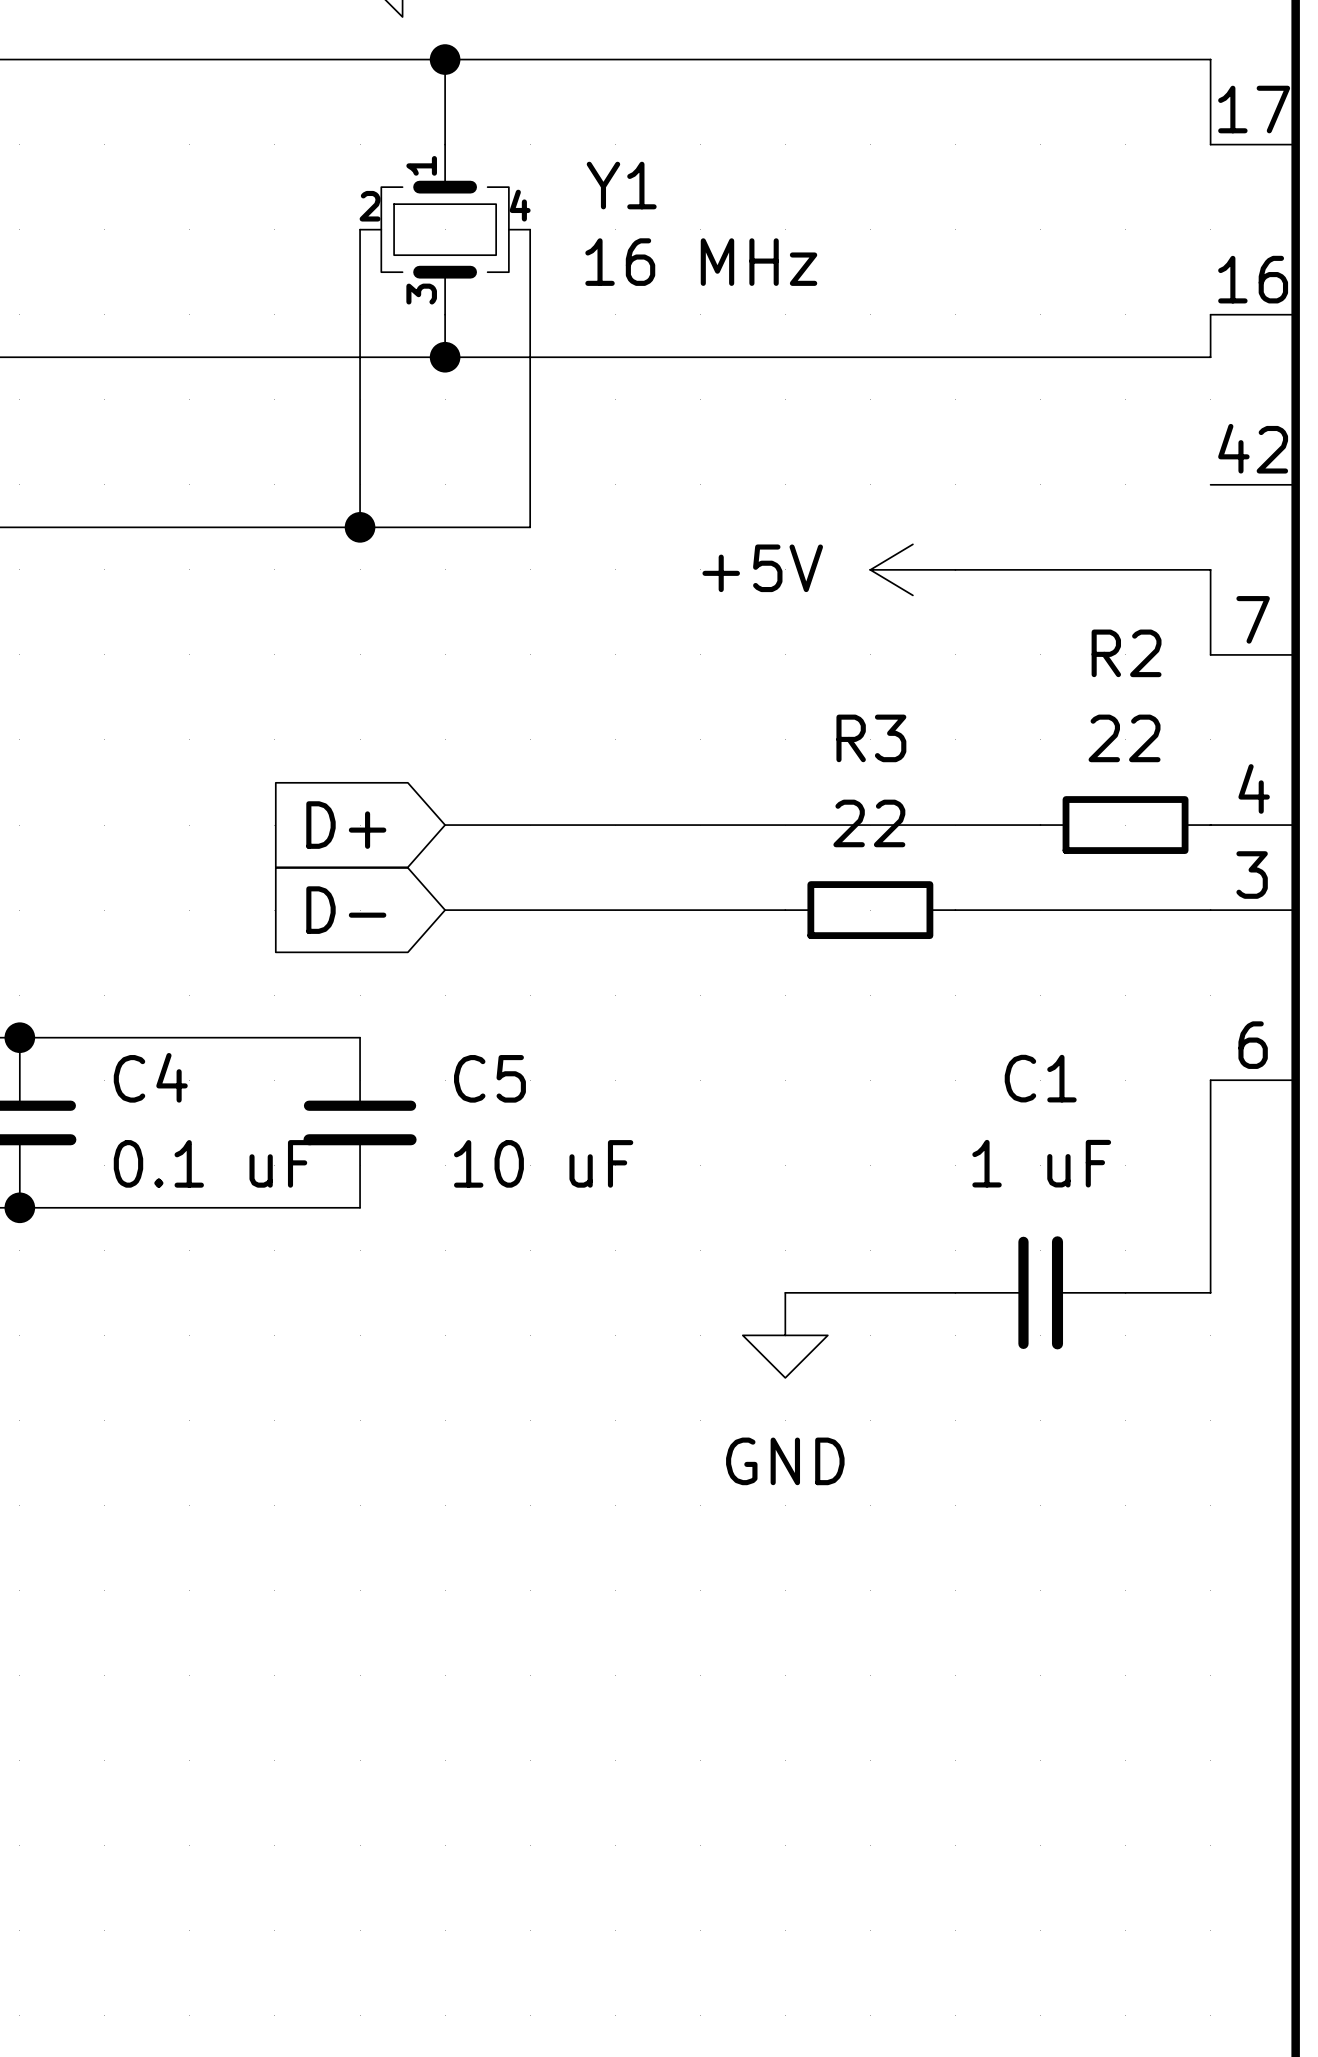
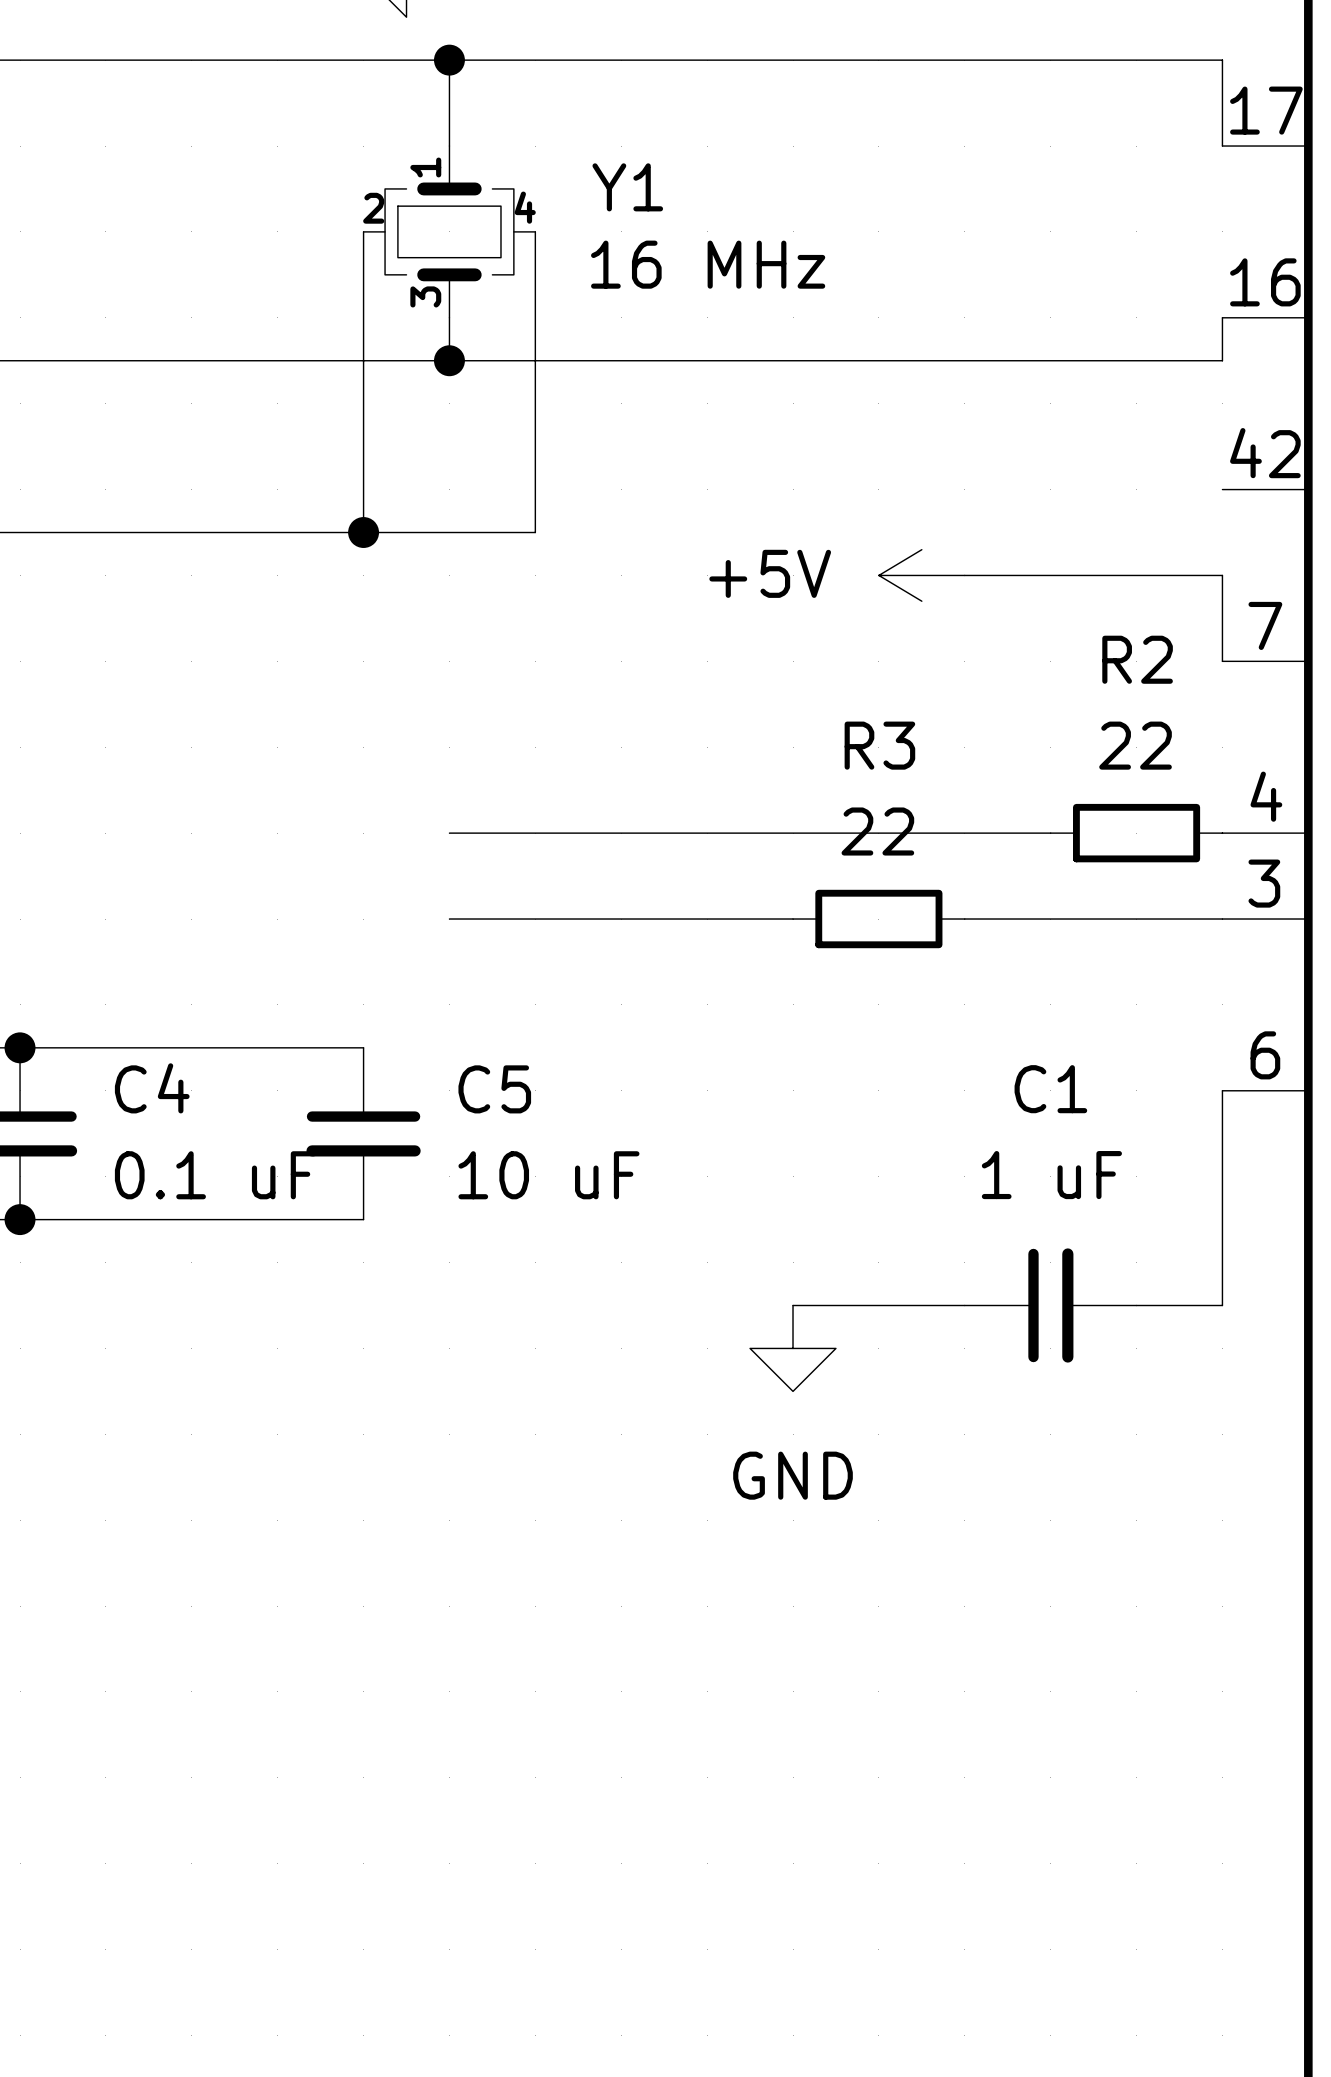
global label: D+ (346, 825) -> none
global label: D- (346, 910) -> none

